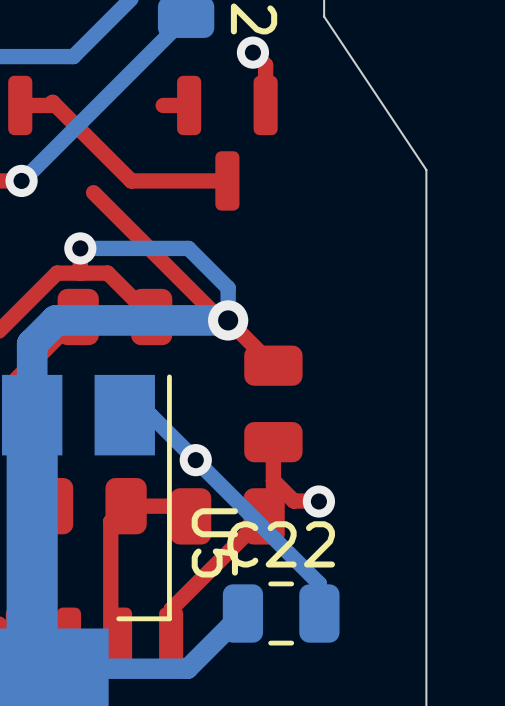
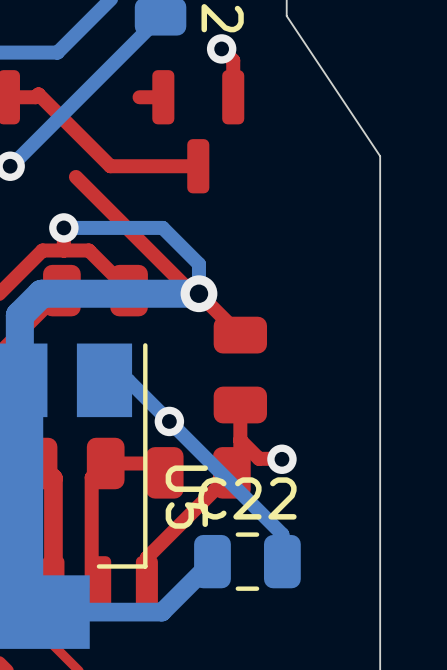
top track: none -> (38, 463) (53, 478) (53, 588)

